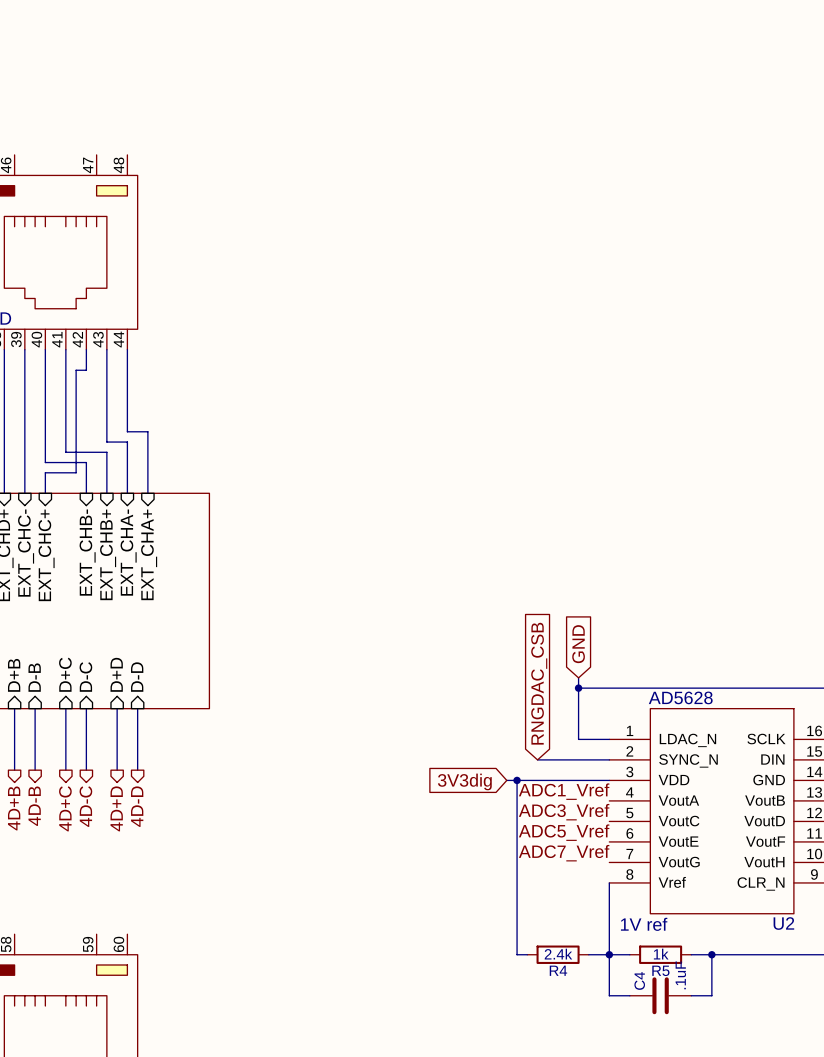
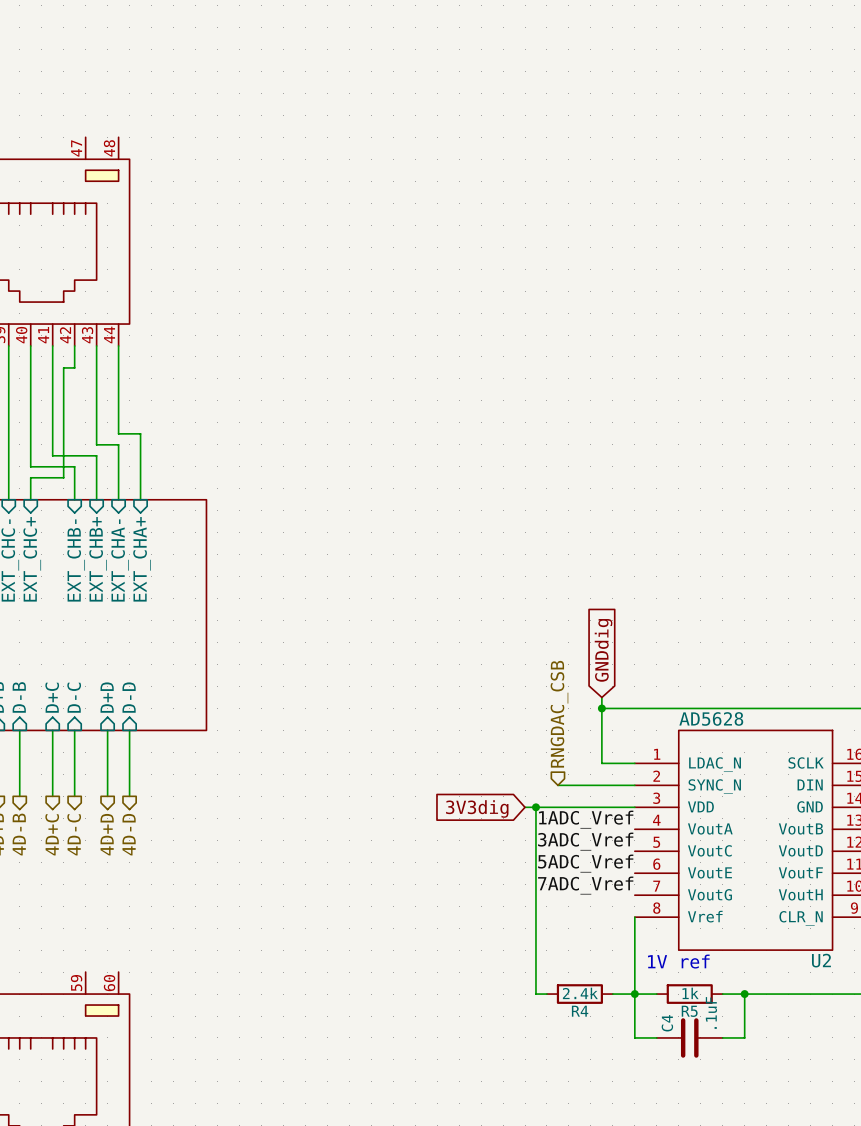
global label: GND (578, 644) -> GNDdig (603, 650)
hierarchical label: none -> RNGDAC_CSB (559, 714)
global label: RNGDAC_CSB (539, 683) -> none
label: ADC1_Vref (564, 791) -> 1ADC_Vref (586, 819)
label: ADC3_Vref (564, 812) -> 3ADC_Vref (585, 841)
label: ADC5_Vref (564, 832) -> 5ADC_Vref (585, 863)
label: ADC7_Vref (564, 853) -> 7ADC_Vref (585, 885)

